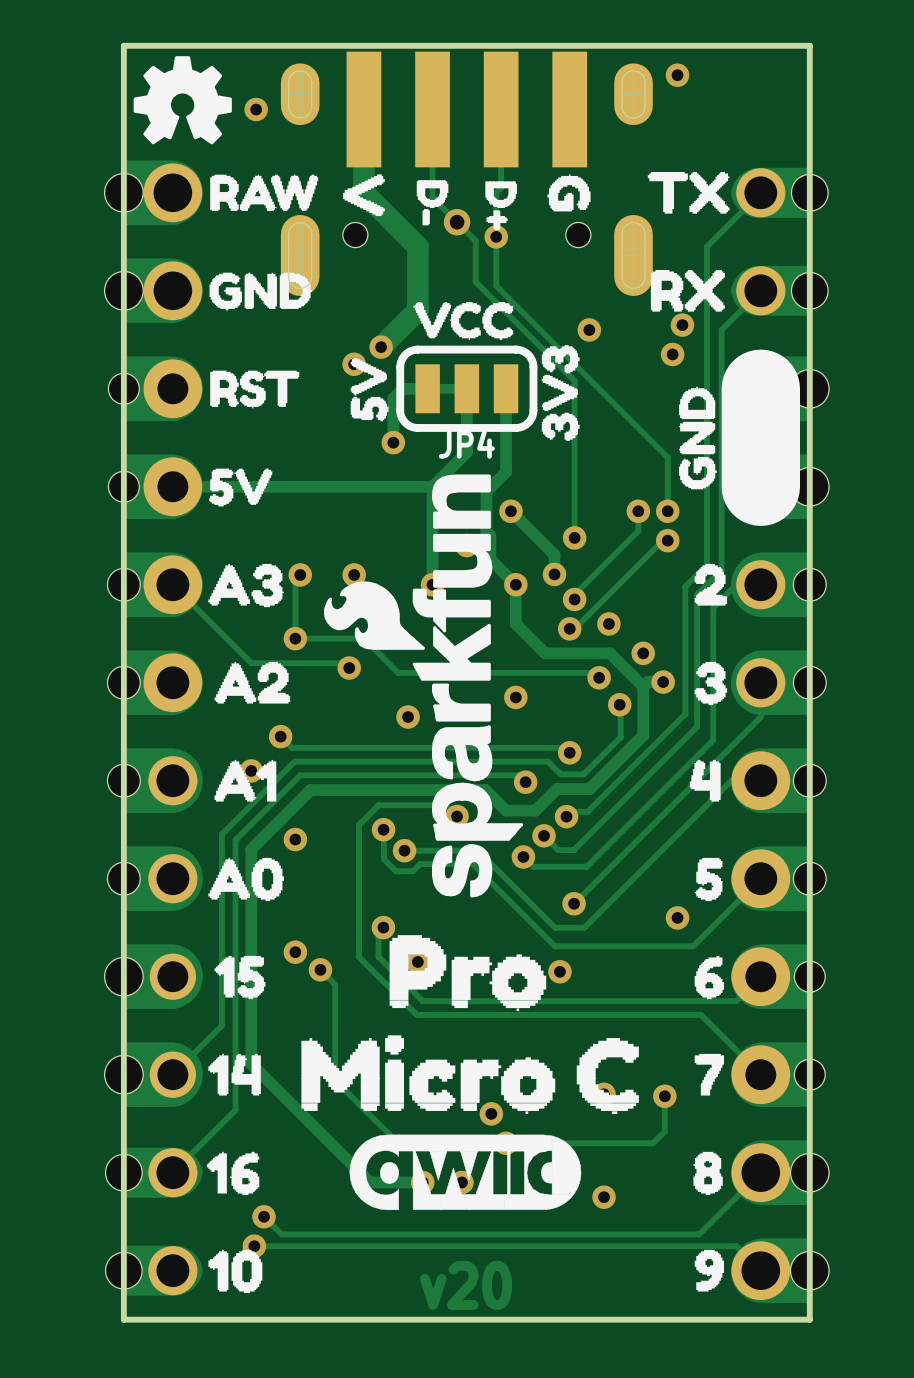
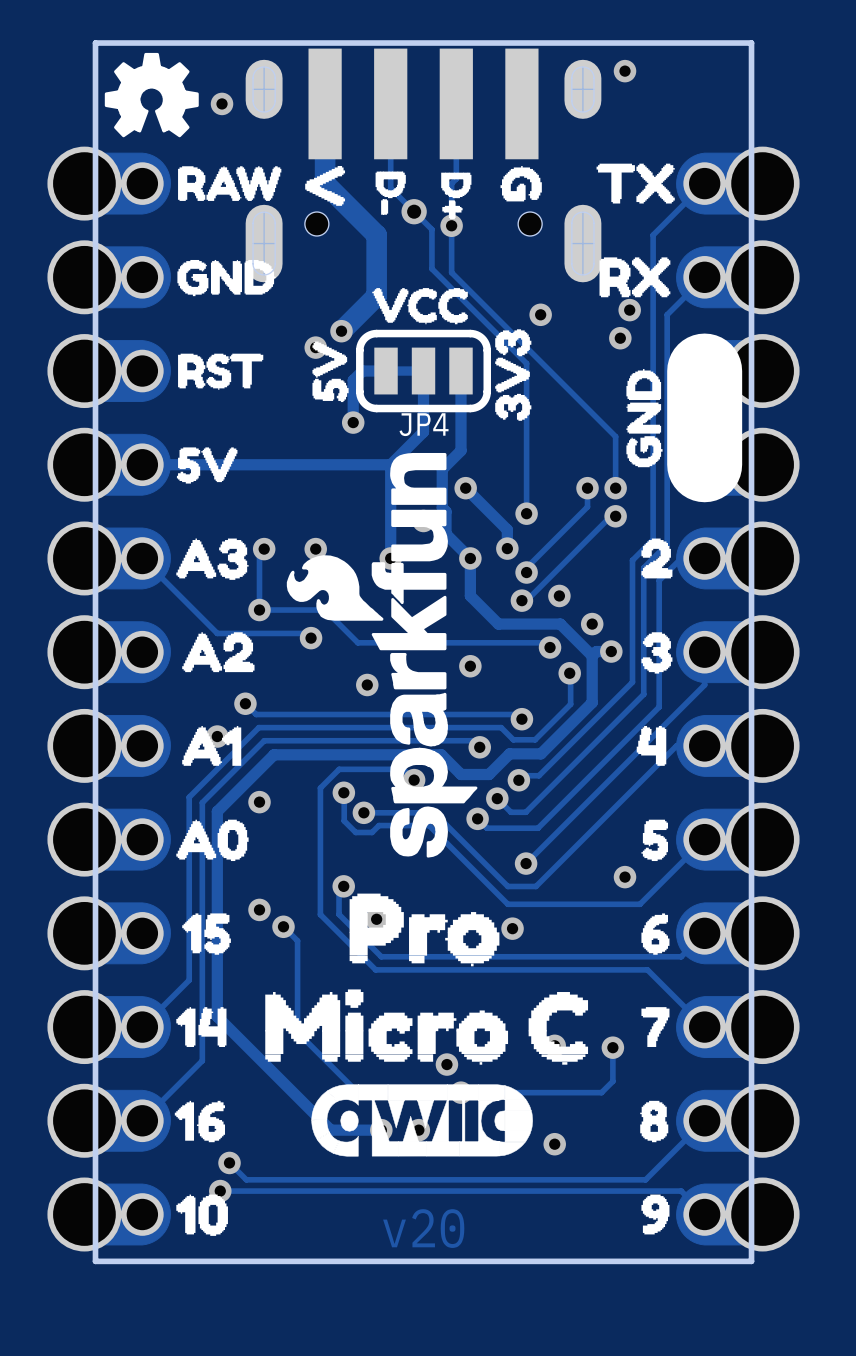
part footprint: [104, 160, 203, 1296] -> [47, 146, 171, 1252]
part footprint: [730, 167, 830, 1304] -> [676, 146, 800, 1252]

